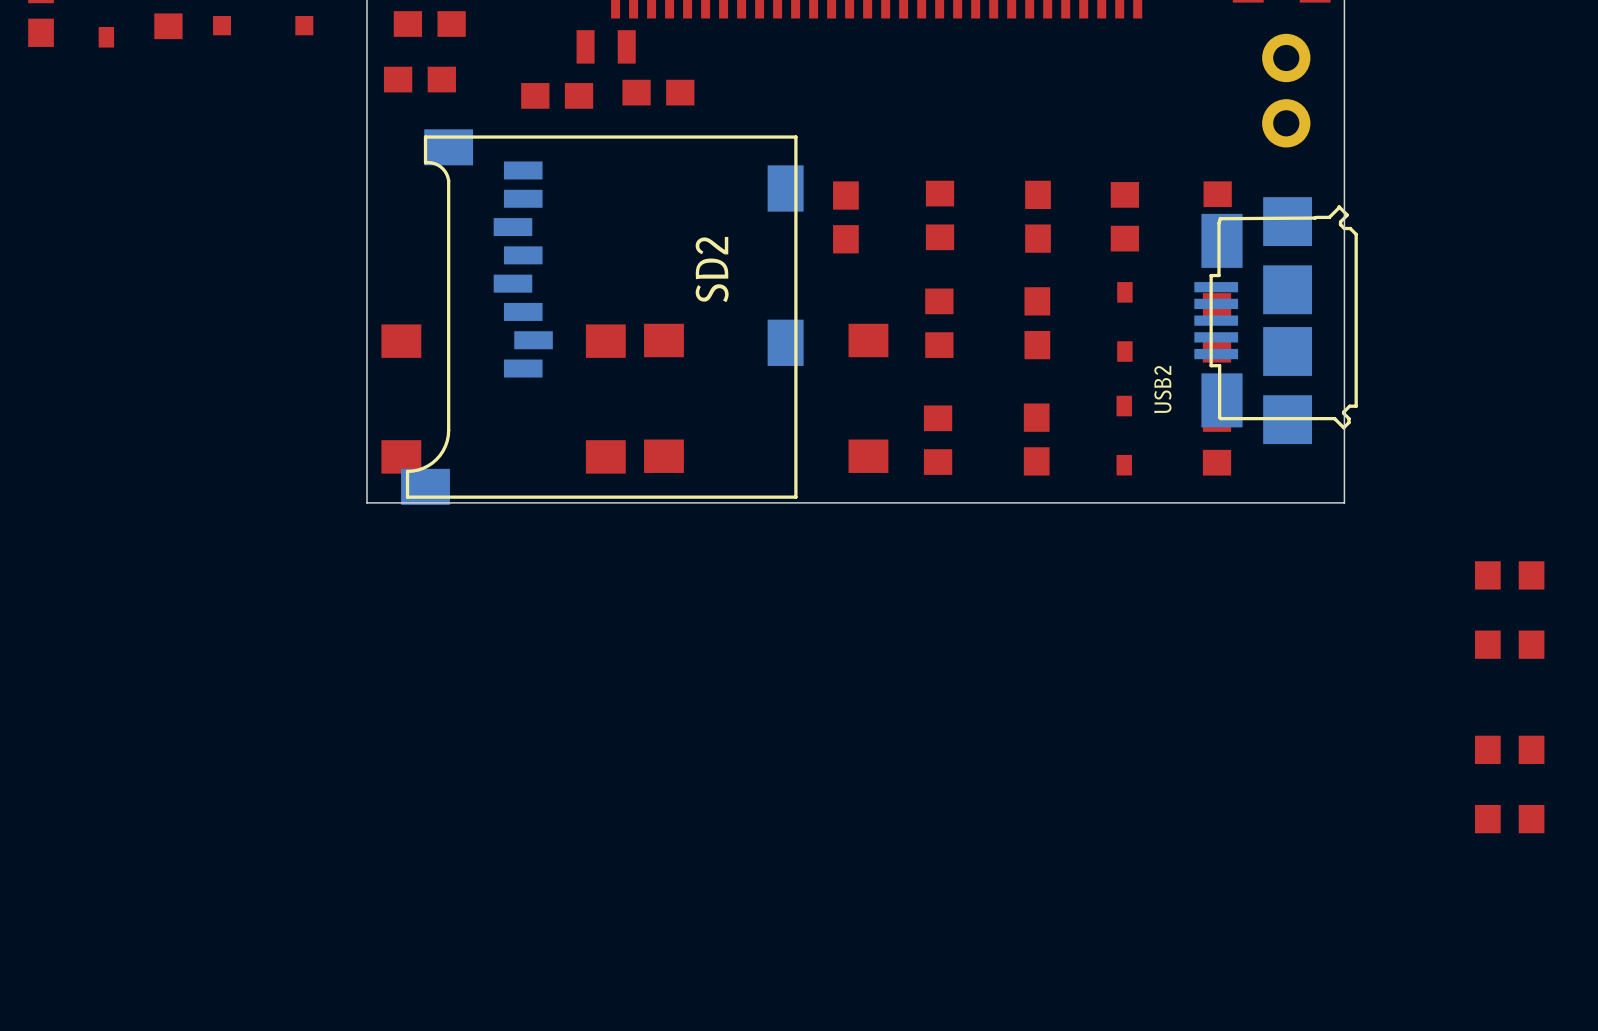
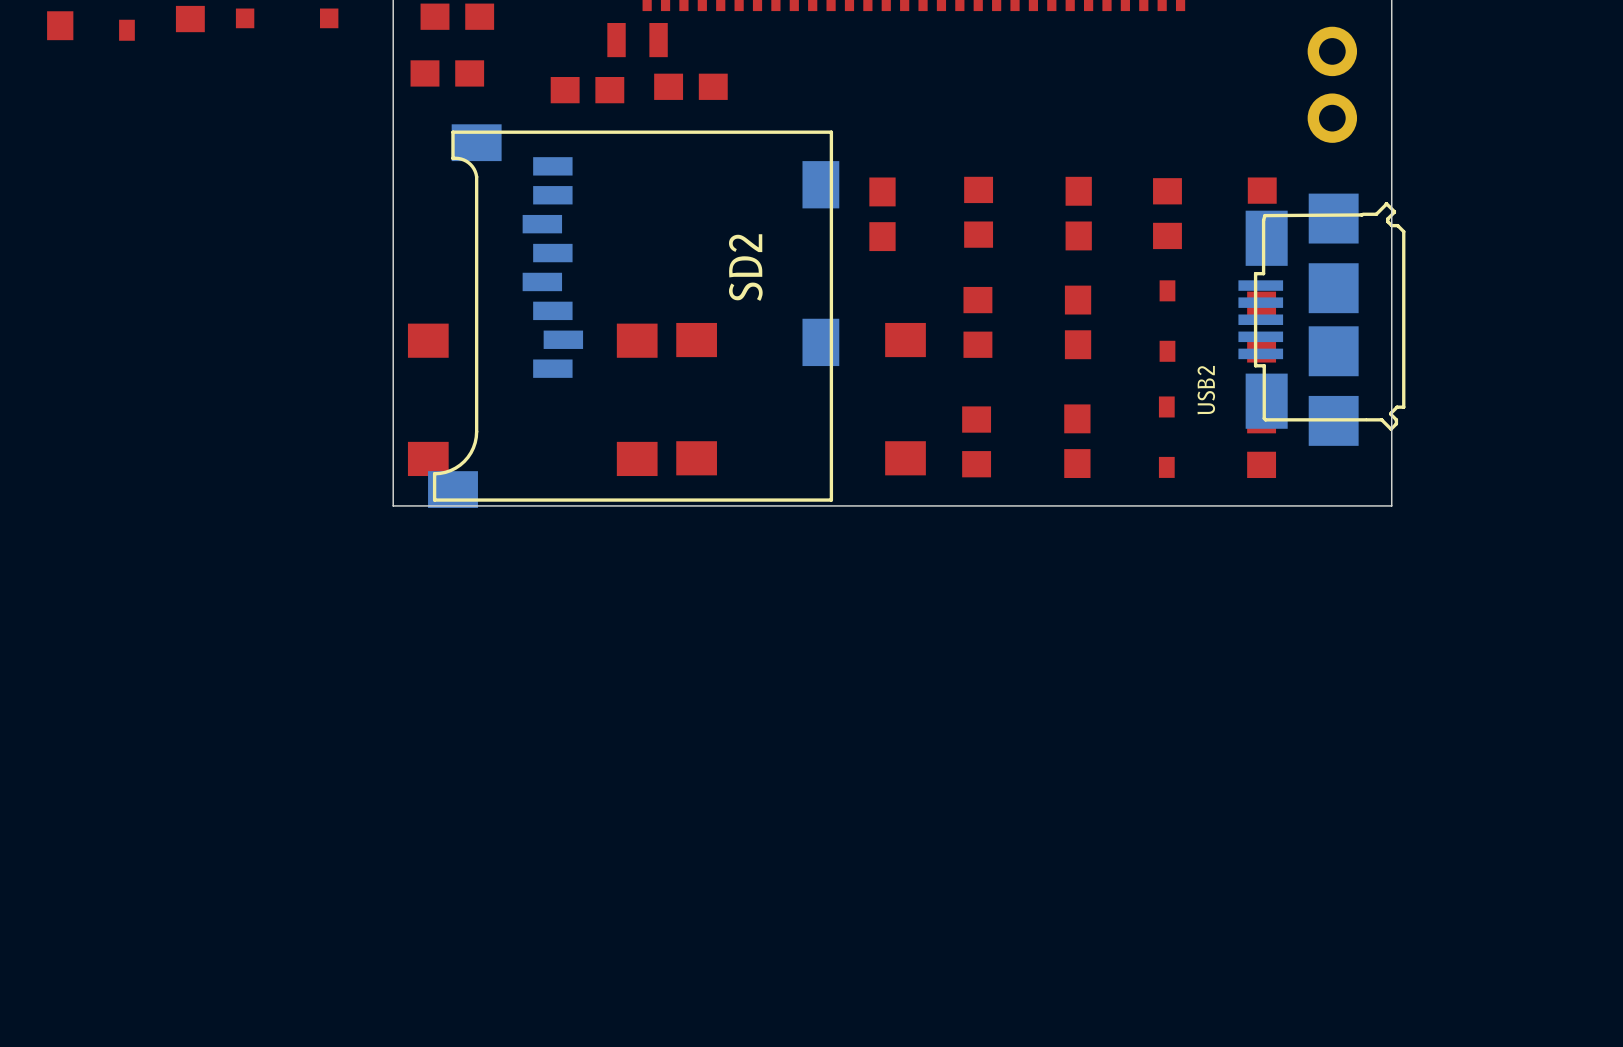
part: (1509, 575) -> none
part: (1509, 644) -> none
part: (1509, 749) -> none
part: (1509, 819) -> none

